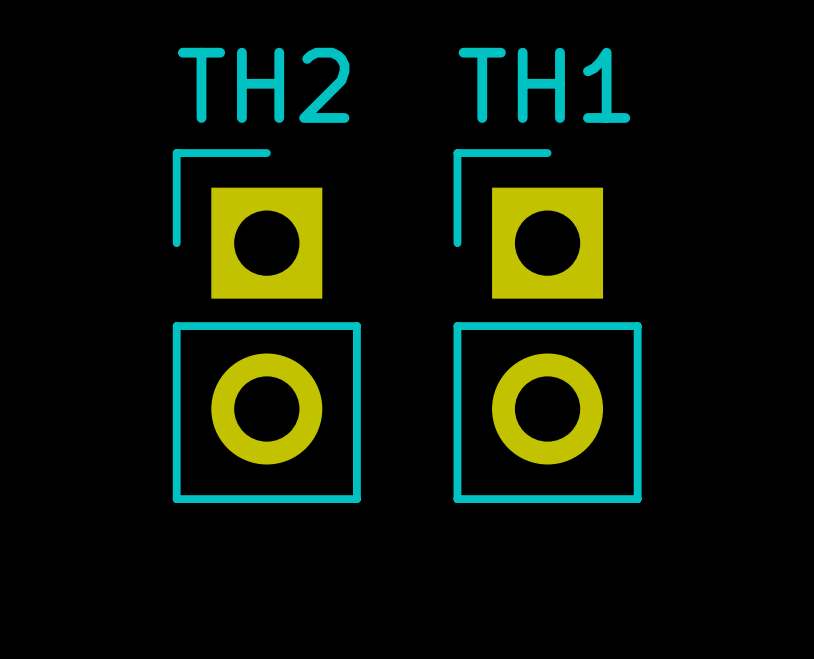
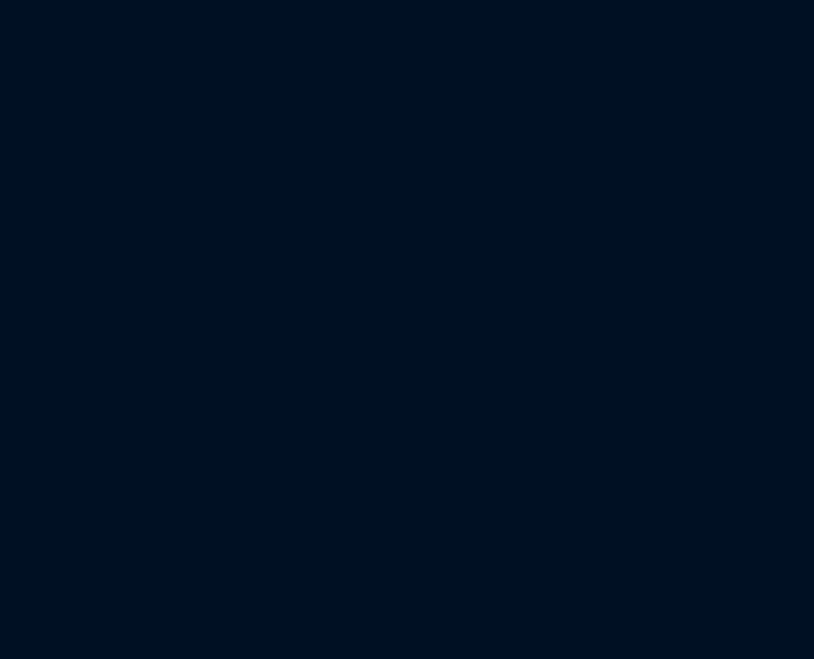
TH2: (266, 326) -> none
TH1: (547, 326) -> none

